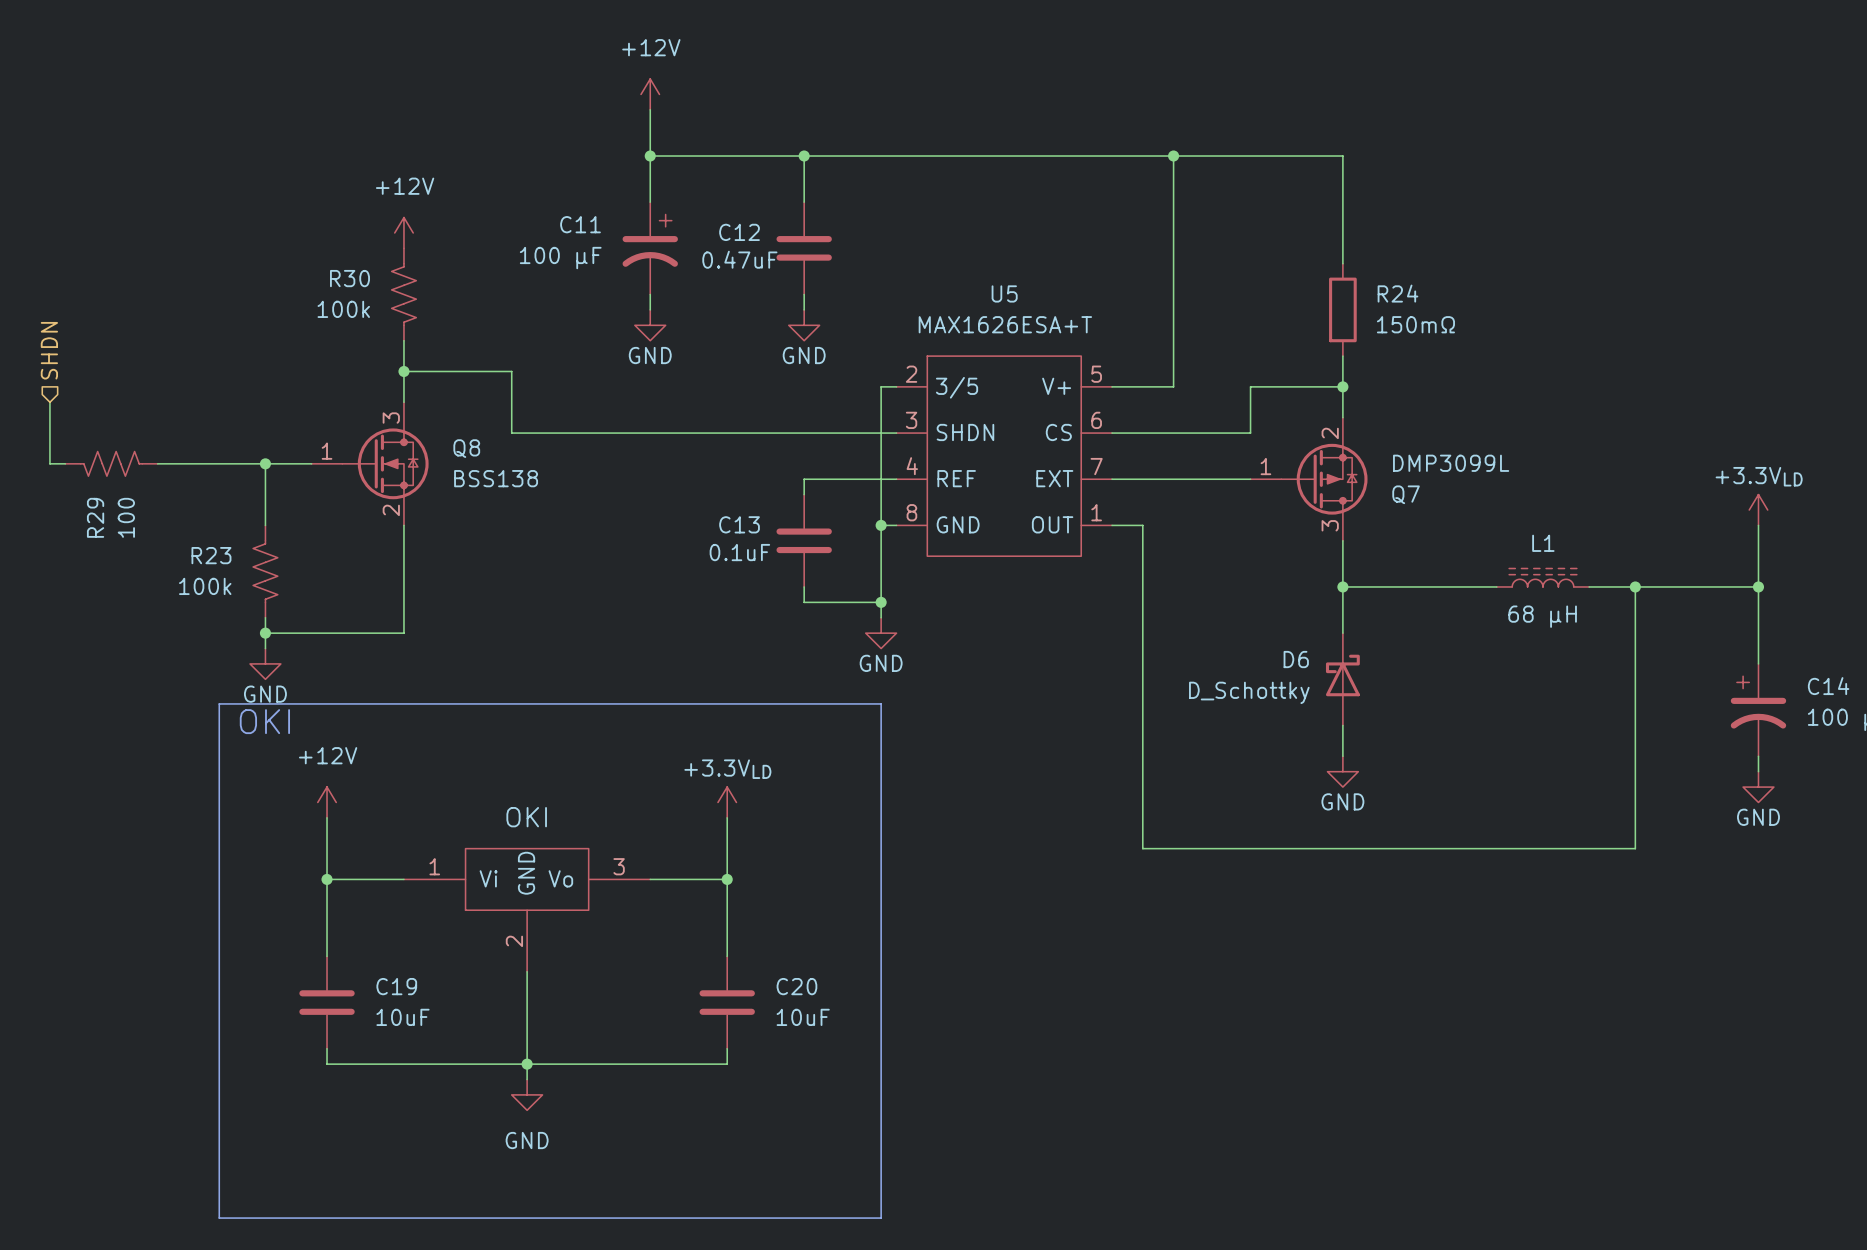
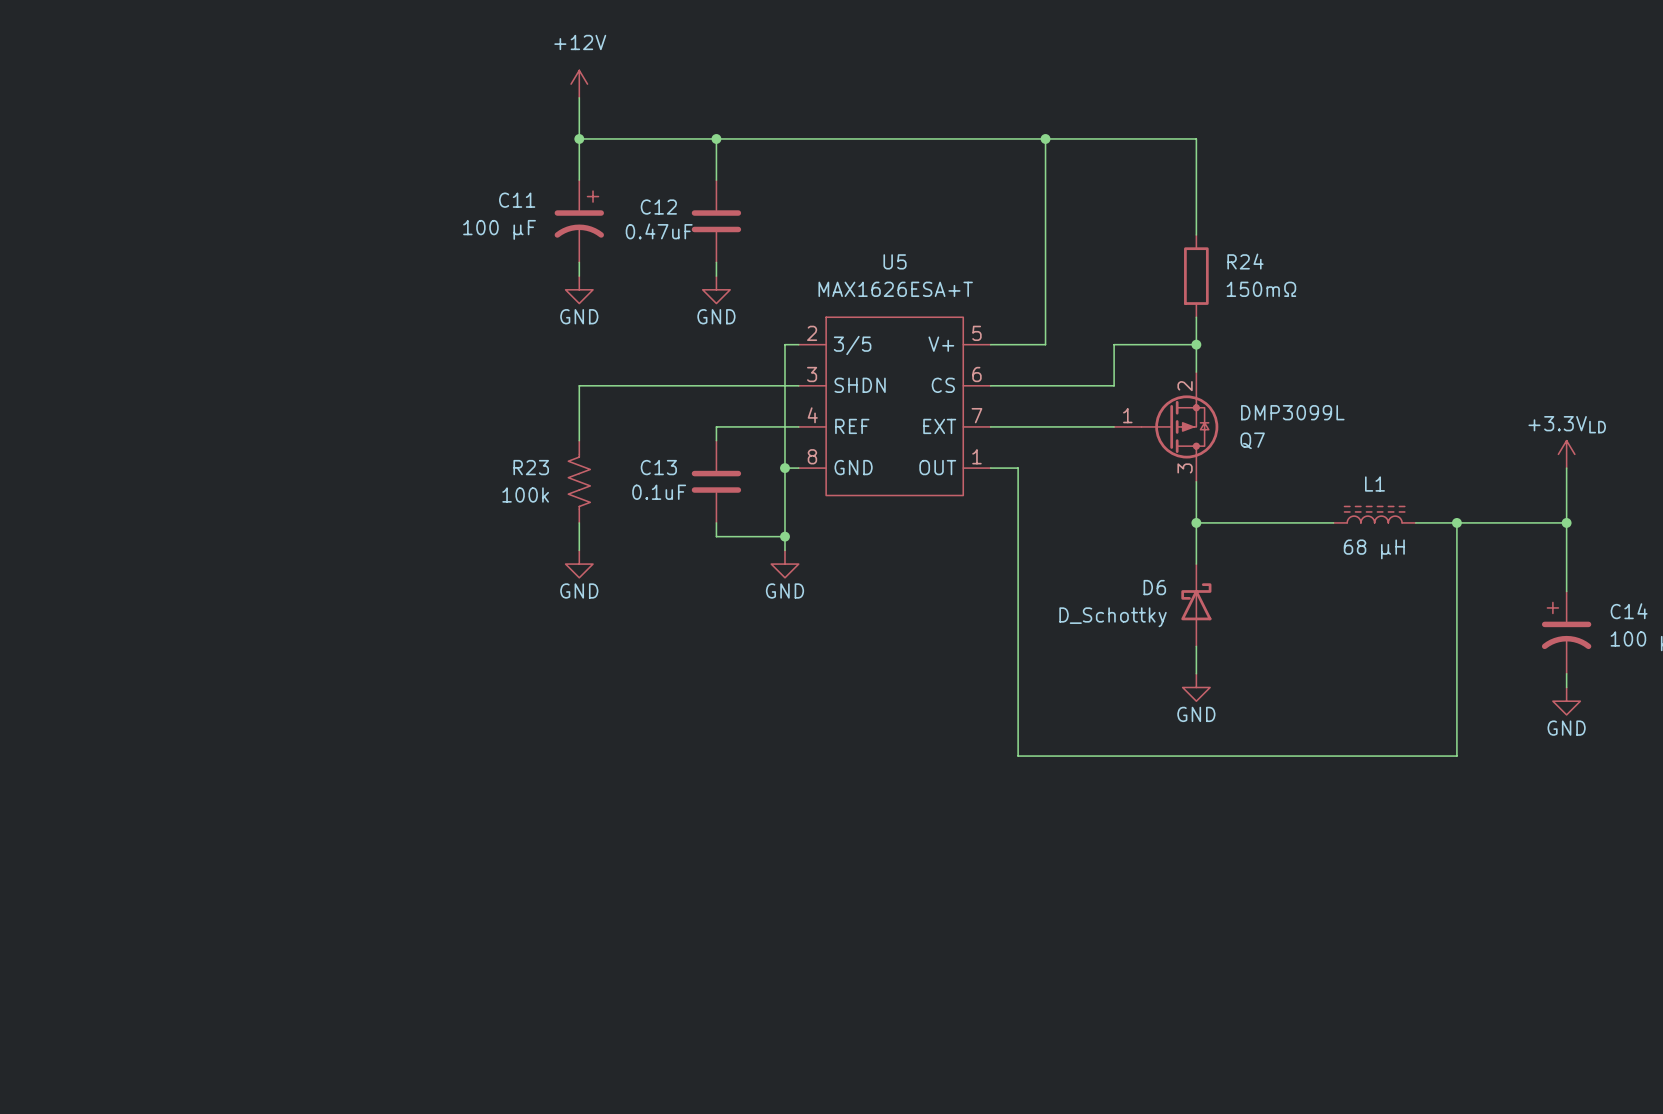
power symbol: +12V (403, 232) -> none
R30: 100k (403, 294) -> none
wire: (403, 340) (403, 402) -> none
hierarchical label: SHDN (49, 350) -> none
wire: (403, 371) (511, 371) (511, 433) (650, 433) -> (579, 440) (579, 385)
junction: (403, 371) -> none
wire: (49, 402) (49, 463) (65, 463) -> none
R29: 100 (111, 463) -> none
wire: (157, 463) (311, 463) -> none
wire: (265, 463) (265, 525) -> none
junction: (265, 463) -> none
Q8: BSS138 (370, 463) -> none
wire: (403, 525) (403, 633) (265, 633) -> none
R23 position: (265, 571) -> (579, 481)
wire: none -> (579, 522) (579, 550)
wire: (265, 617) (265, 648) -> none
junction: (265, 633) -> none
power symbol: none -> GND (579, 564)
power symbol: GND (265, 663) -> none
line: (219, 703) (881, 703) (881, 1218) (219, 1218) (219, 703) -> none
text: OKI (264, 721) -> none
power symbol: +12V (327, 802) -> none
power symbol: +3.3VLD (727, 802) -> none
wire: (327, 817) (327, 956) -> none
wire: (727, 817) (727, 956) -> none
wire: (327, 879) (403, 879) -> none
junction: (327, 879) -> none
wire: (650, 879) (727, 879) -> none
junction: (727, 879) -> none
part: OKI (527, 910) -> none
wire: (527, 971) (527, 1079) -> none
C19: 10uF (327, 1002) -> none
C20: 10uF (727, 1002) -> none
wire: (327, 1048) (327, 1064) (727, 1064) (727, 1048) -> none
junction: (527, 1064) -> none
power symbol: GND (527, 1094) -> none

